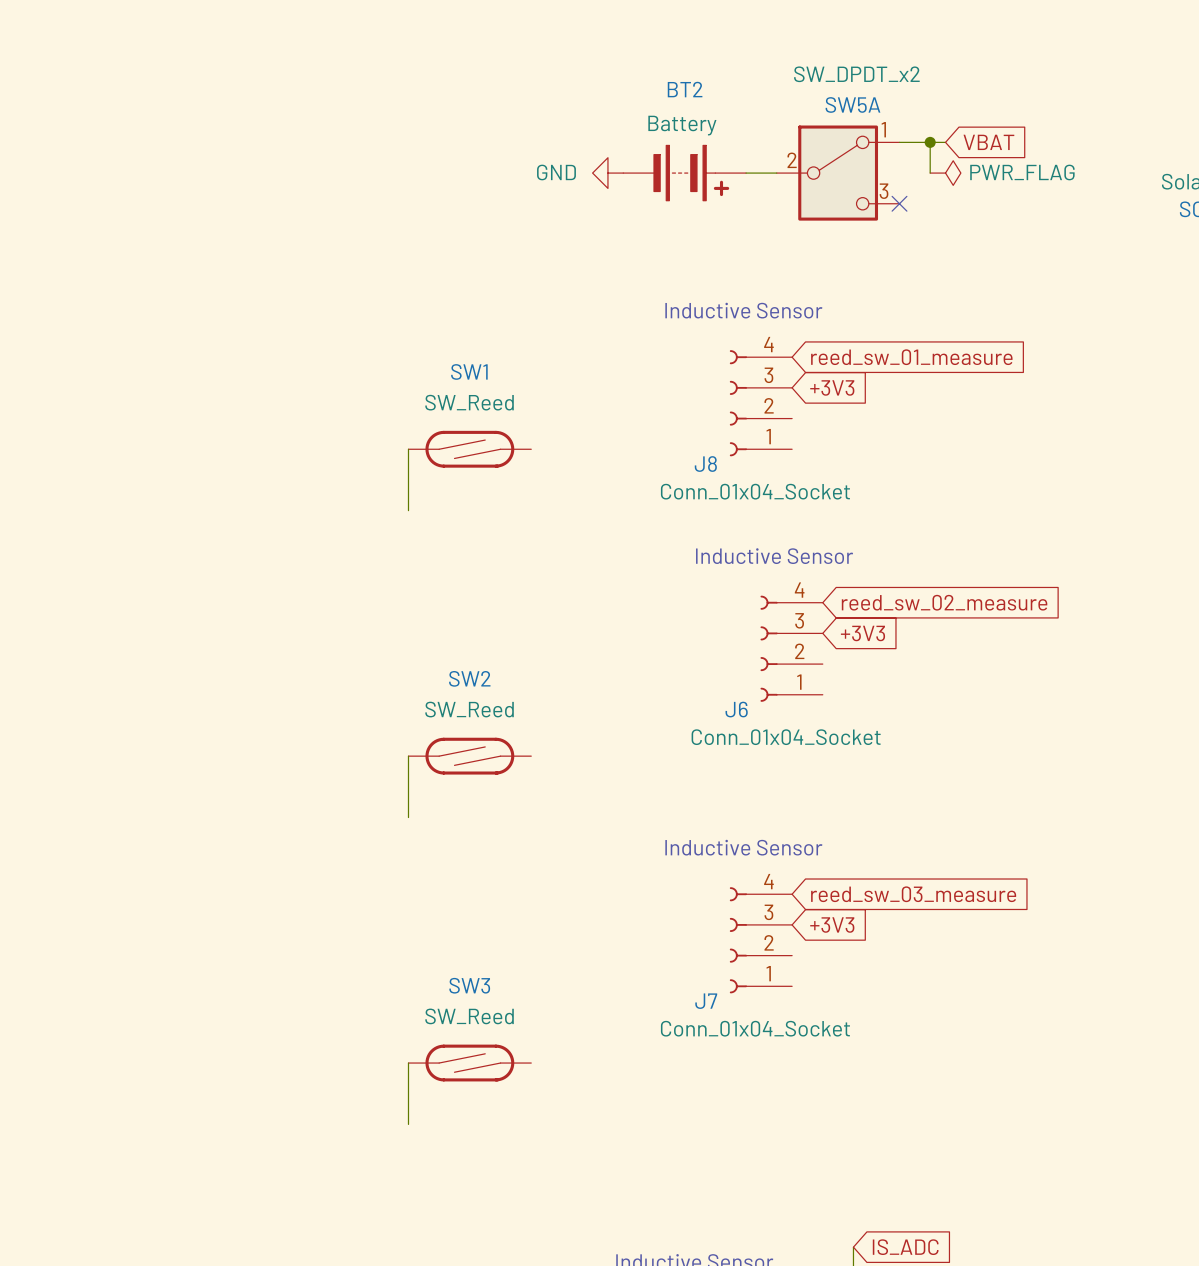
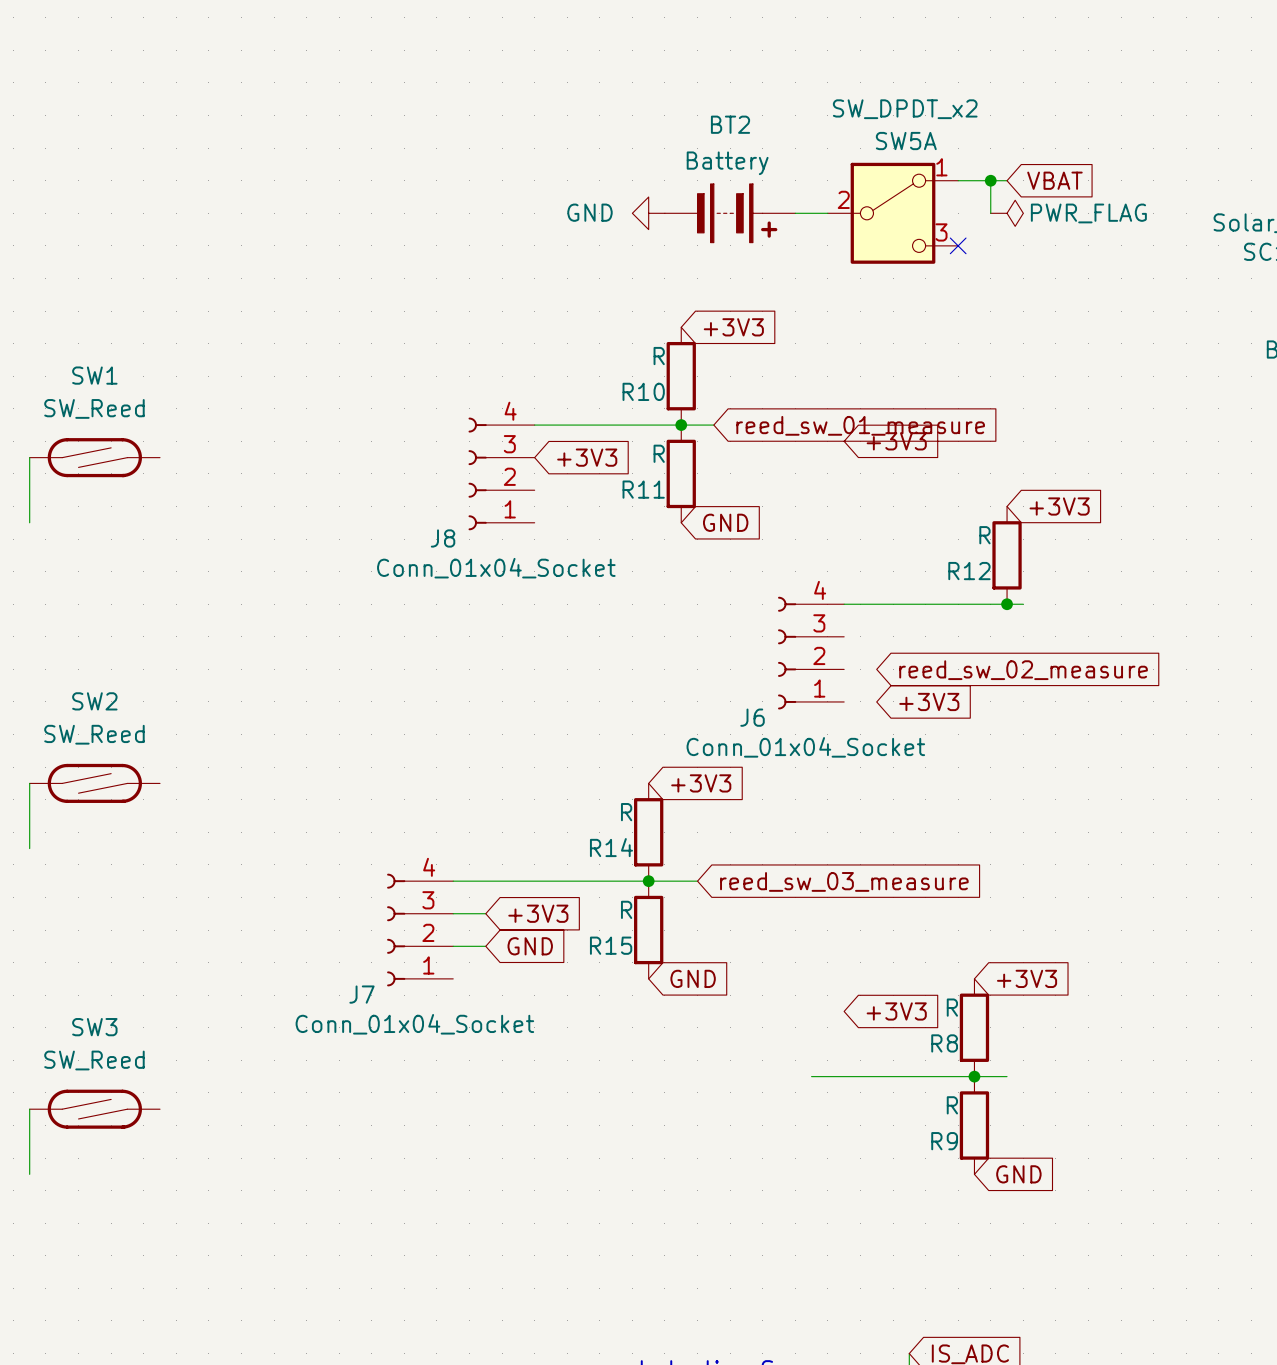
global label: none -> +3V3 (733, 327)
text: Inductive Sensor (743, 310) -> none
R10: none -> R (681, 376)
global label position: reed_sw_01_measure (911, 357) -> reed_sw_01_measure (860, 425)
wire: none -> (534, 425) (713, 425)
junction: none -> (681, 425)
wire: none -> (29, 457) (29, 522)
global label: none -> +3V3 (587, 457)
J8 position: (760, 403) -> (501, 473)
R11: none -> R (681, 473)
wire: (408, 449) (408, 510) -> none
SW1 position: (469, 449) -> (94, 457)
global label: none -> +3V3 (1059, 506)
global label: none -> GND (725, 522)
R12: none -> R (1007, 555)
wire: none -> (844, 604) (1023, 604)
junction: none -> (1007, 604)
text: Inductive Sensor (774, 556) -> none
J6 position: (791, 648) -> (811, 653)
wire: none -> (29, 783) (29, 848)
global label: none -> +3V3 (701, 783)
wire: (408, 756) (408, 817) -> none
SW2 position: (469, 756) -> (94, 783)
R14: none -> R (648, 832)
wire: none -> (453, 881) (697, 881)
junction: none -> (648, 881)
wire: none -> (453, 913) (485, 913)
global label: none -> +3V3 (538, 913)
text: Inductive Sensor (743, 847) -> none
R15: none -> R (648, 930)
wire: none -> (453, 946) (485, 946)
global label: none -> GND (530, 946)
global label: none -> GND (693, 978)
global label position: reed_sw_03_measure (913, 894) -> reed_sw_03_measure (844, 881)
global label: none -> +3V3 (1027, 978)
J7 position: (760, 940) -> (420, 930)
R8: none -> R (974, 1027)
wire: none -> (811, 1076) (1007, 1076)
junction: none -> (974, 1076)
wire: none -> (29, 1109) (29, 1174)
R9: none -> R (974, 1125)
wire: (408, 1063) (408, 1124) -> none
SW3 position: (469, 1063) -> (94, 1109)
global label: none -> GND (1018, 1174)

